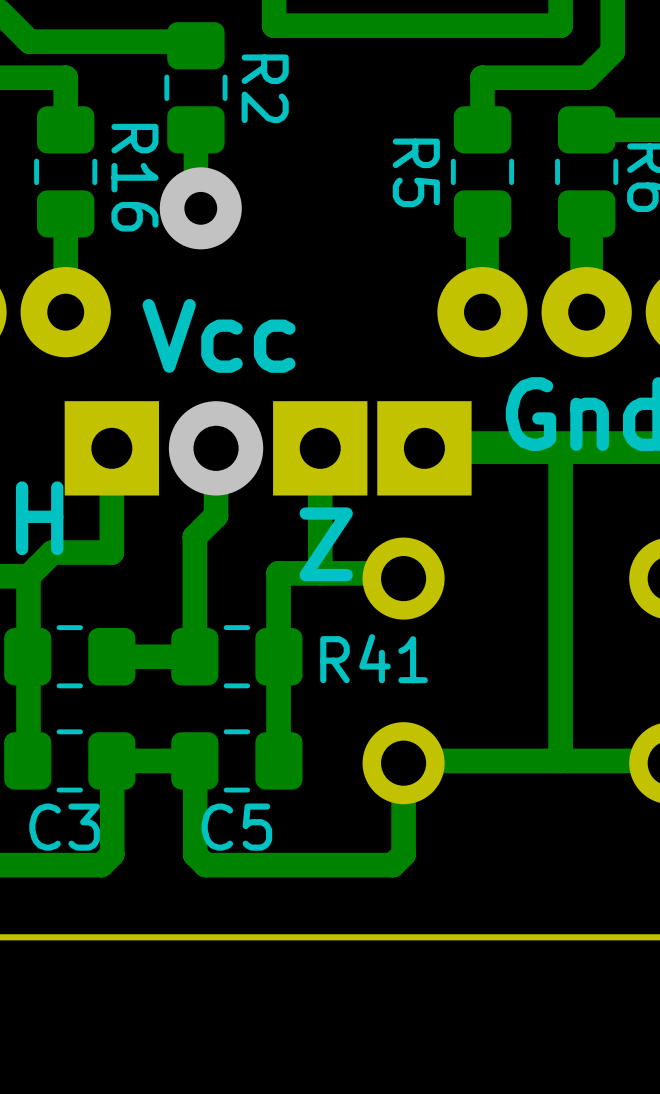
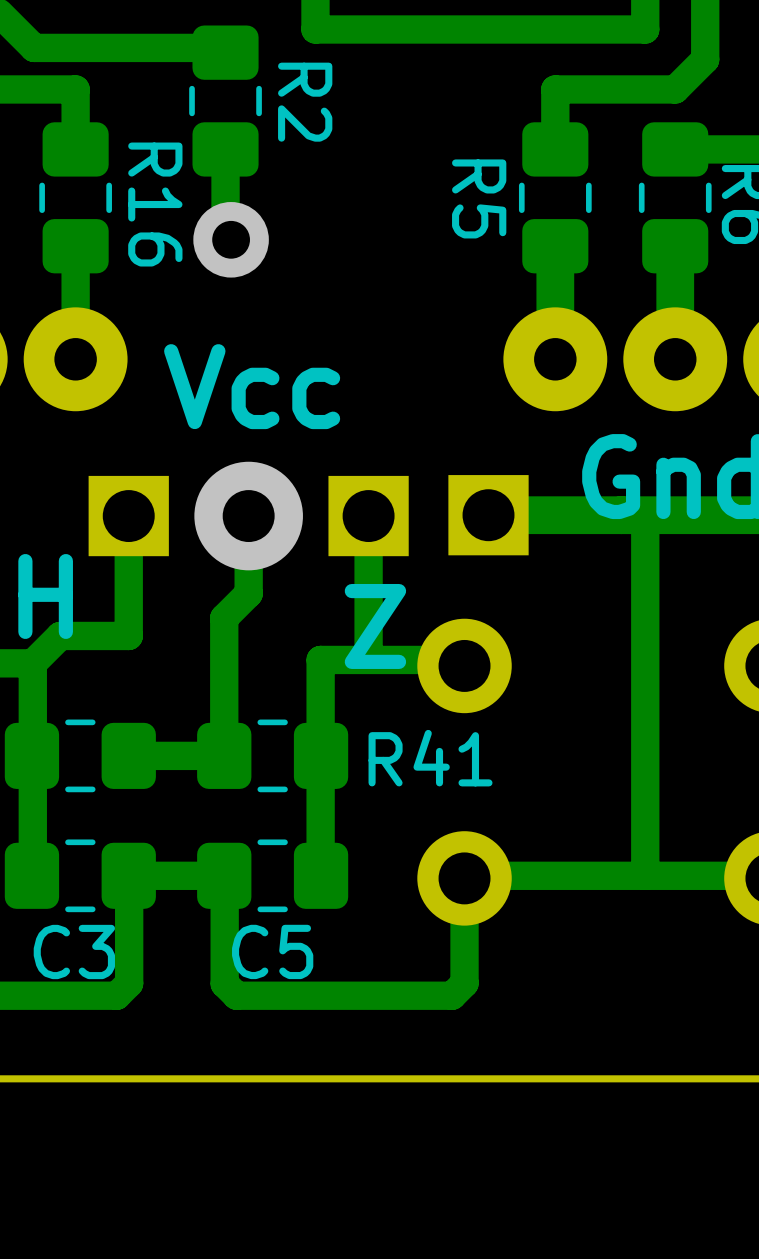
via size: [159, 167, 242, 250] -> [193, 202, 269, 278]
part footprint: [64, 401, 160, 496] -> [88, 475, 169, 557]
part footprint: [273, 401, 368, 496] -> [328, 475, 409, 557]
part footprint: [377, 401, 472, 496] -> [448, 475, 529, 556]

